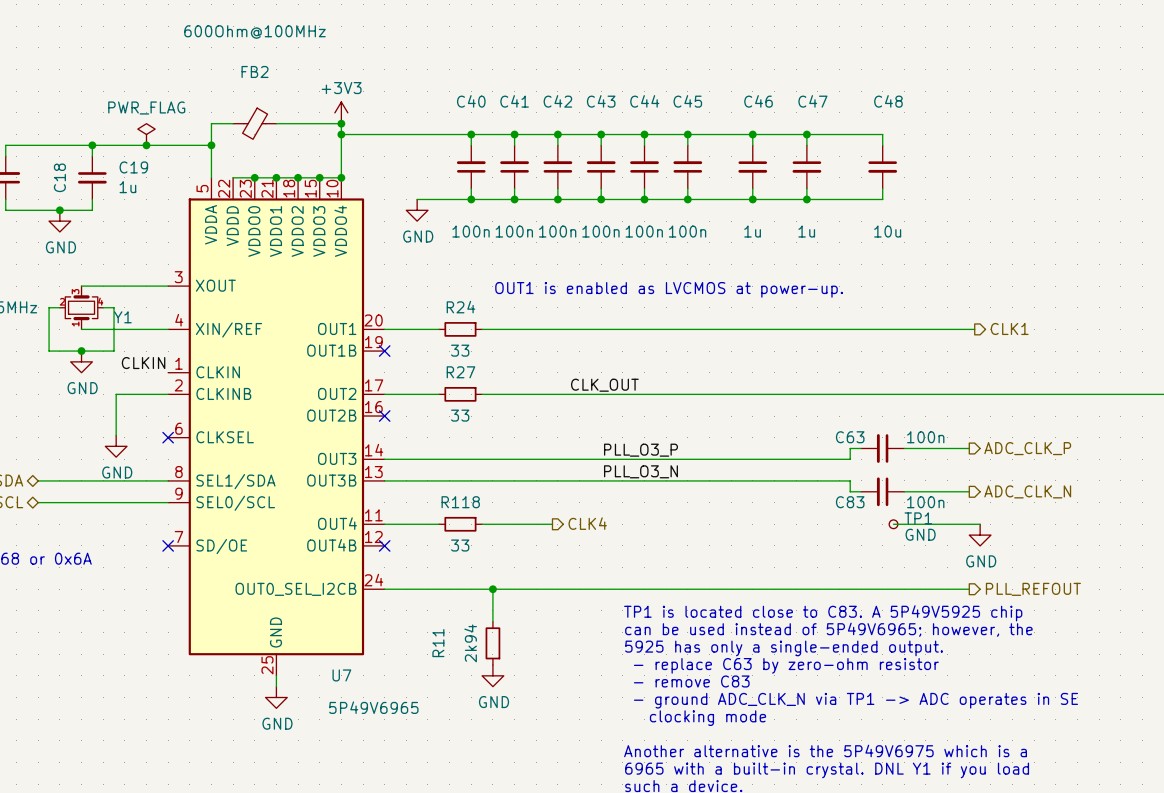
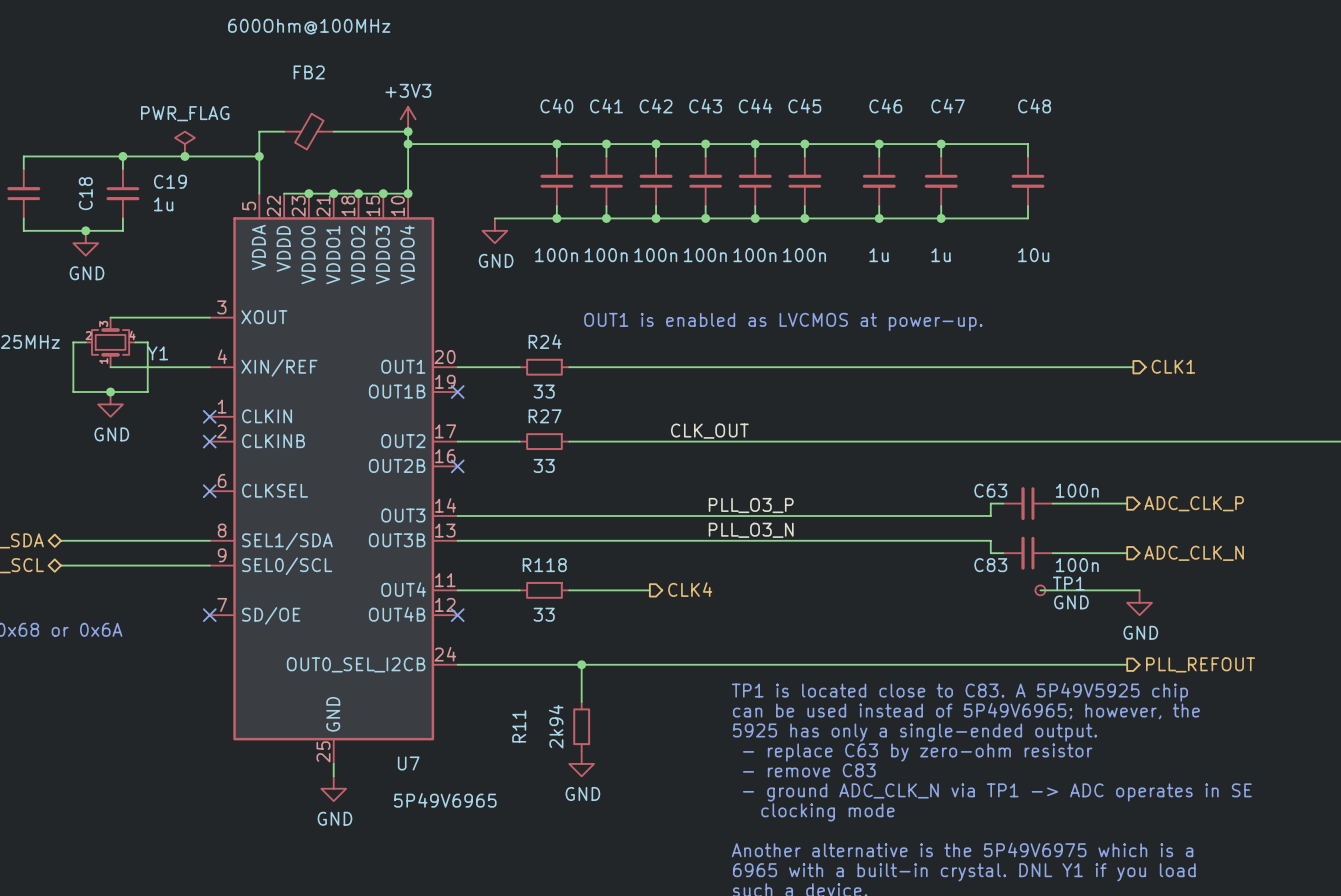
label: CLKIN (143, 363) -> none
no-connect mark: none -> (209, 416)
wire: (168, 394) (116, 394) (116, 435) -> none
no-connect mark: none -> (209, 441)
power symbol: GND (116, 446) -> none

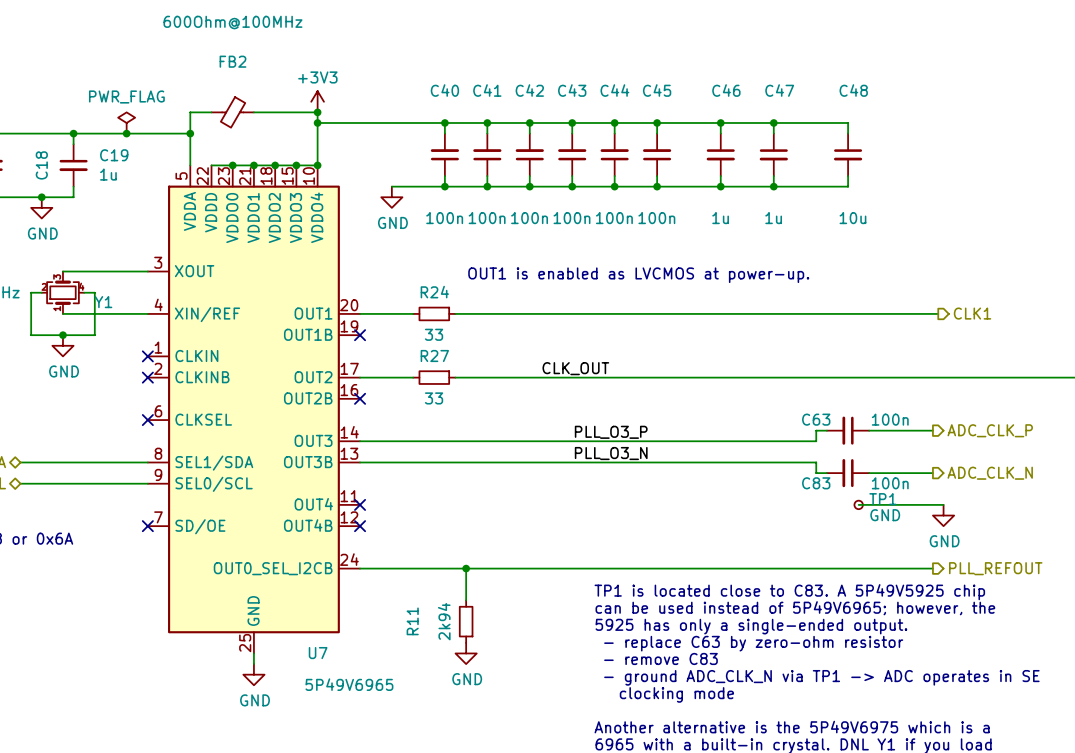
hierarchical label: CLK4 (690, 589) -> none
wire: (457, 590) (519, 590) -> none
no-connect mark: none -> (360, 504)
R118: 33 (544, 590) -> none
wire: (569, 590) (649, 590) -> none

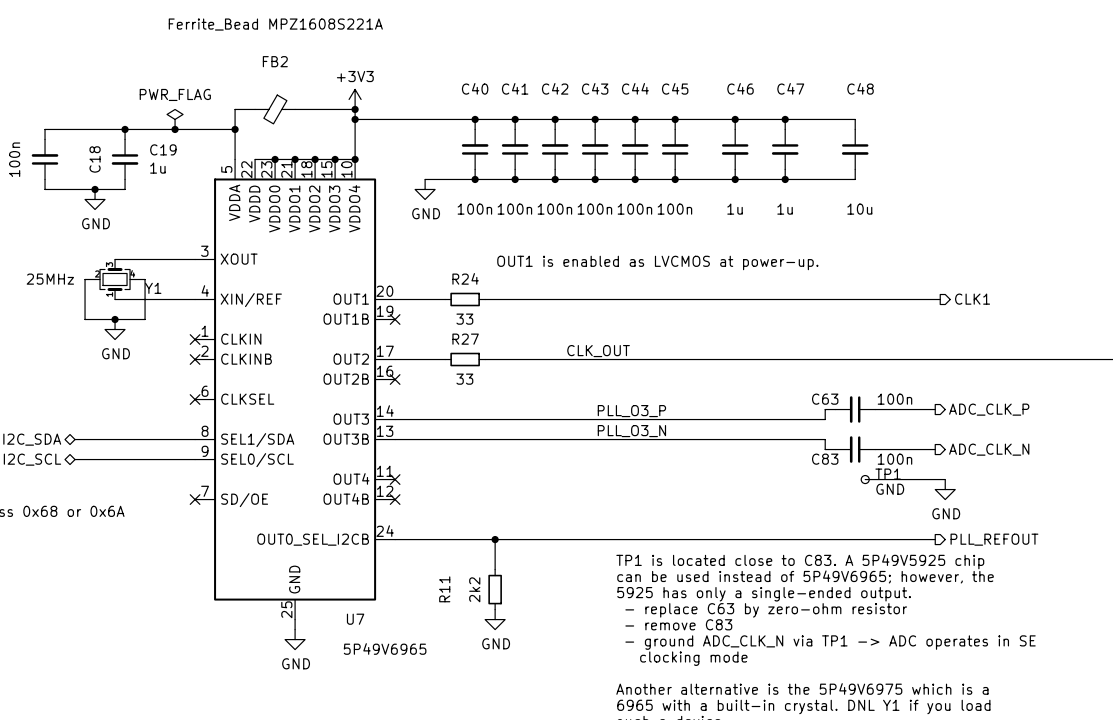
FB2 value: 600Ohm@100MHz (232, 22) -> Ferrite_Bead MPZ1608S221A (275, 24)
R11 value: 2k94 (444, 621) -> 2k2 (474, 589)

